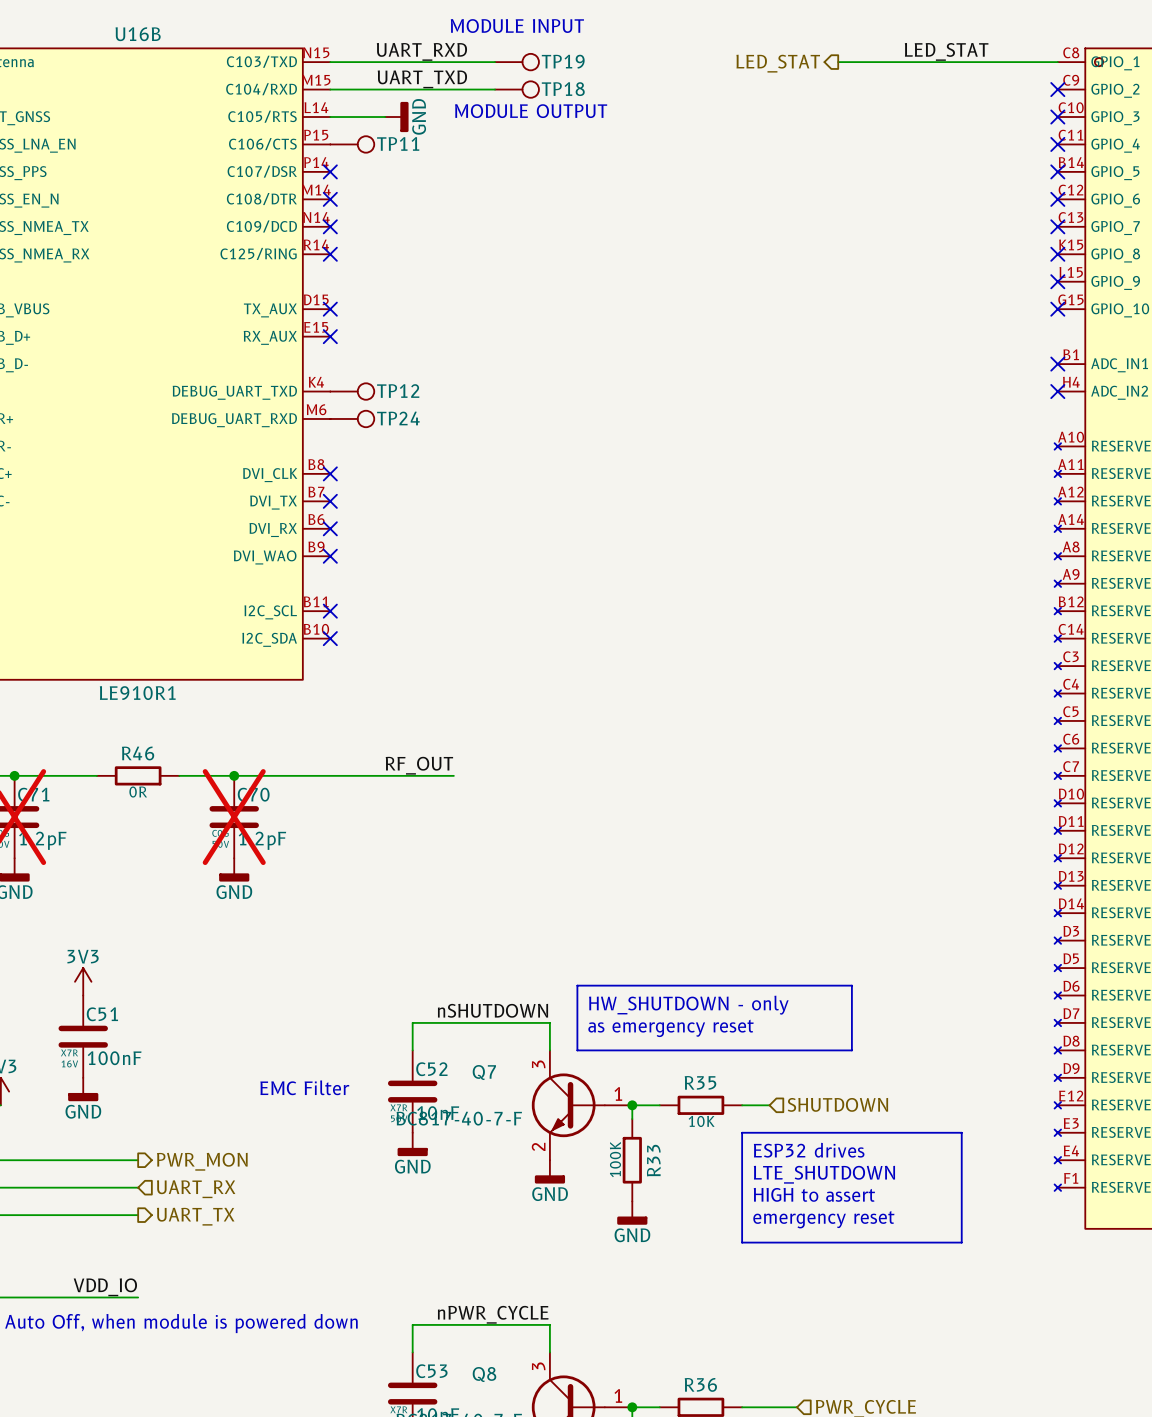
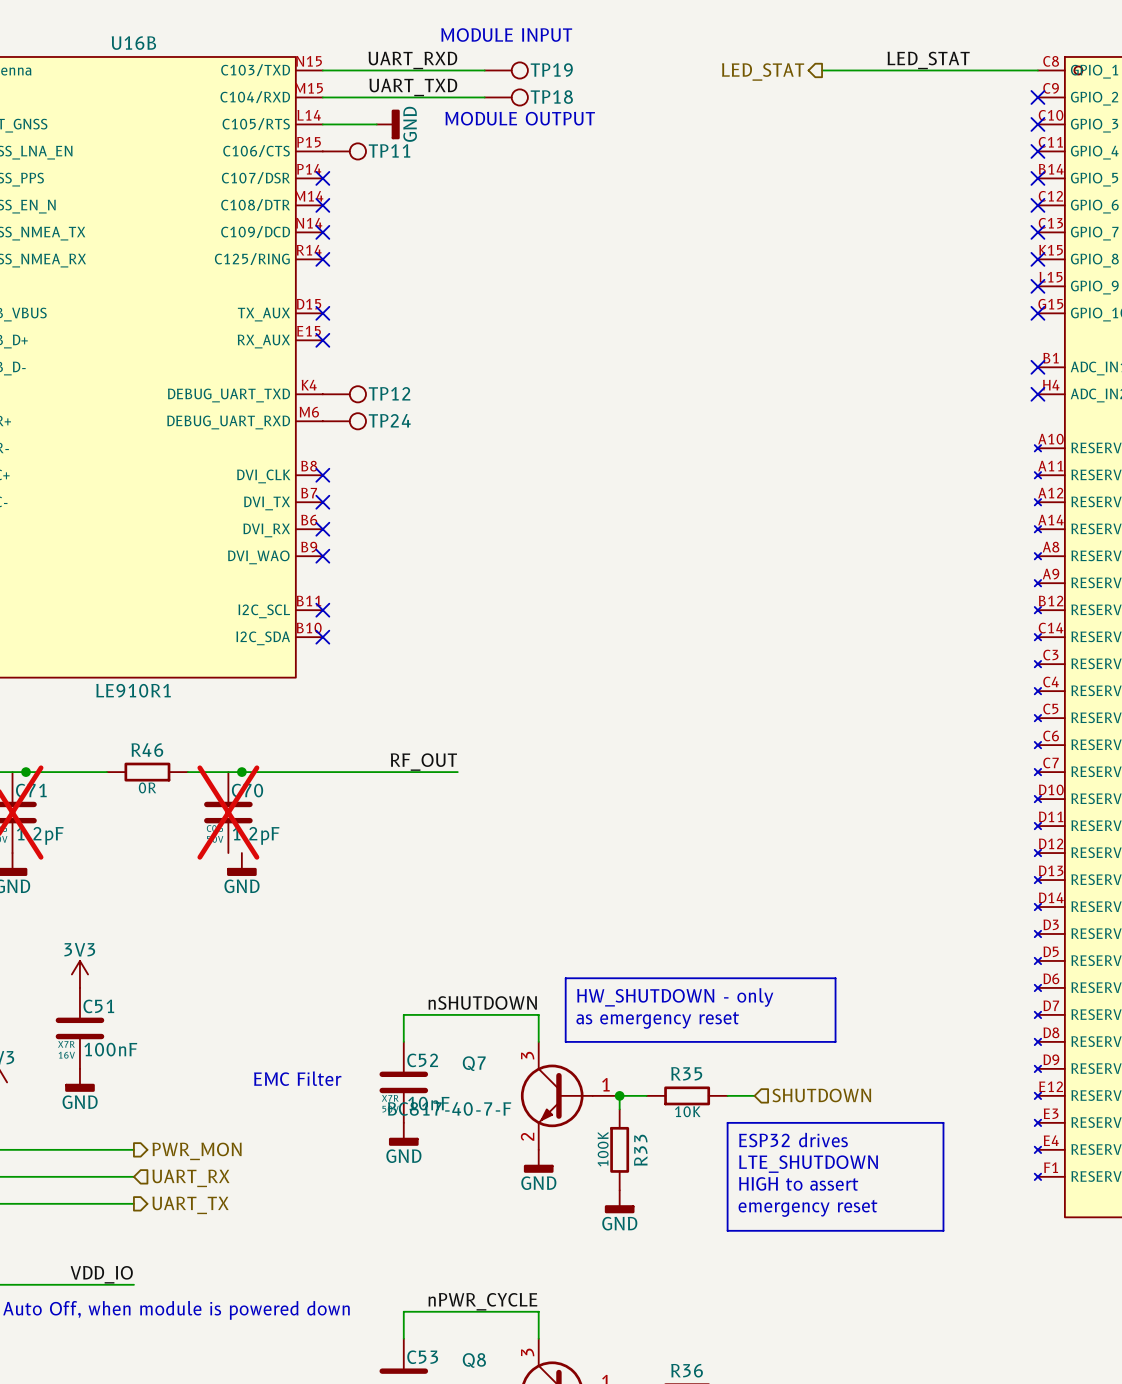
label position: RF_OUT (419, 765) -> RF_OUT (423, 762)
junction position: (14, 775) -> (26, 772)
R46 position: (138, 775) -> (147, 772)
junction position: (234, 775) -> (241, 772)
wire: none -> (444, 772) (457, 772)
power symbol position: GND (234, 869) -> GND (241, 864)

